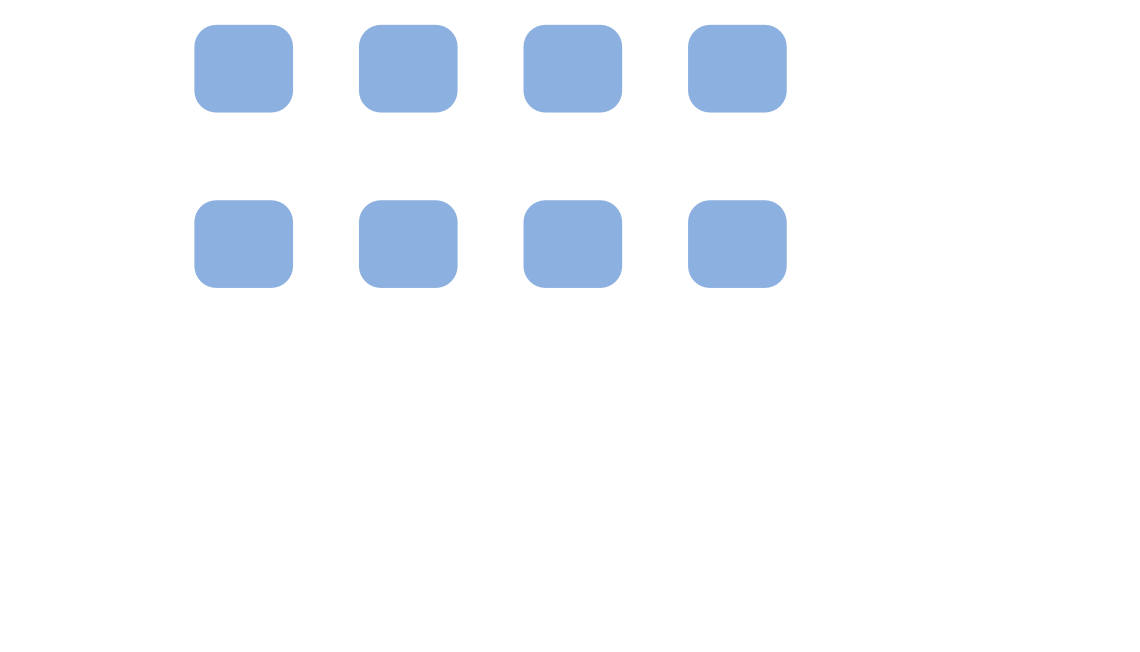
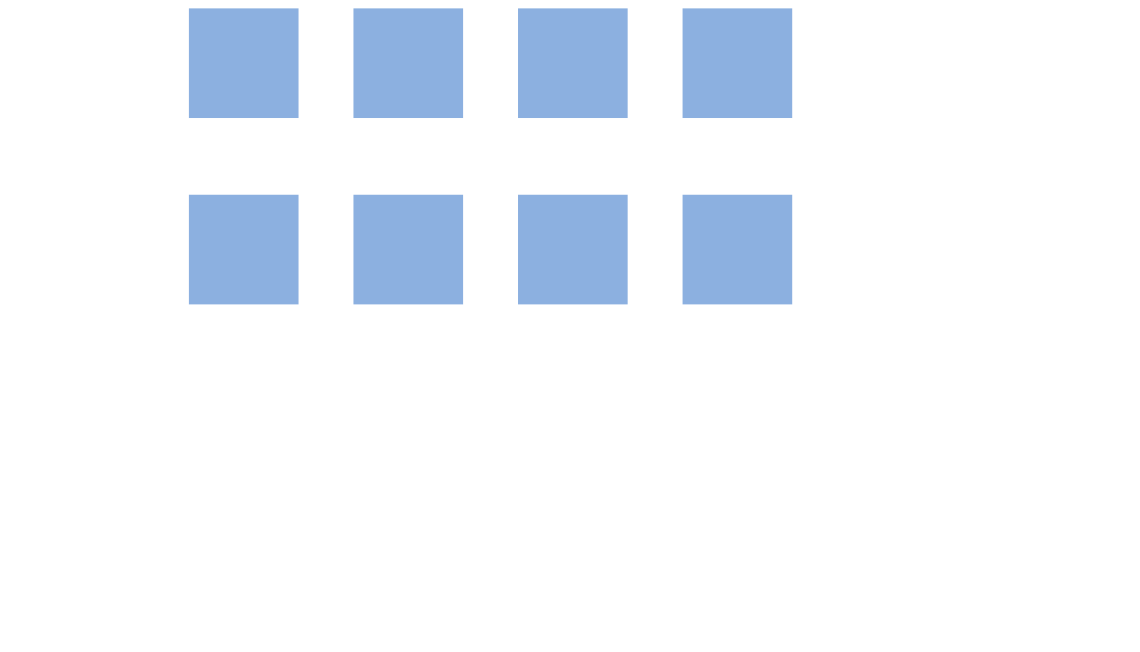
part footprint: [194, 24, 294, 288] -> [188, 8, 299, 305]
part footprint: [358, 24, 458, 288] -> [353, 8, 464, 305]
part footprint: [523, 24, 623, 288] -> [518, 8, 628, 305]
part footprint: [688, 24, 787, 288] -> [682, 8, 793, 305]

